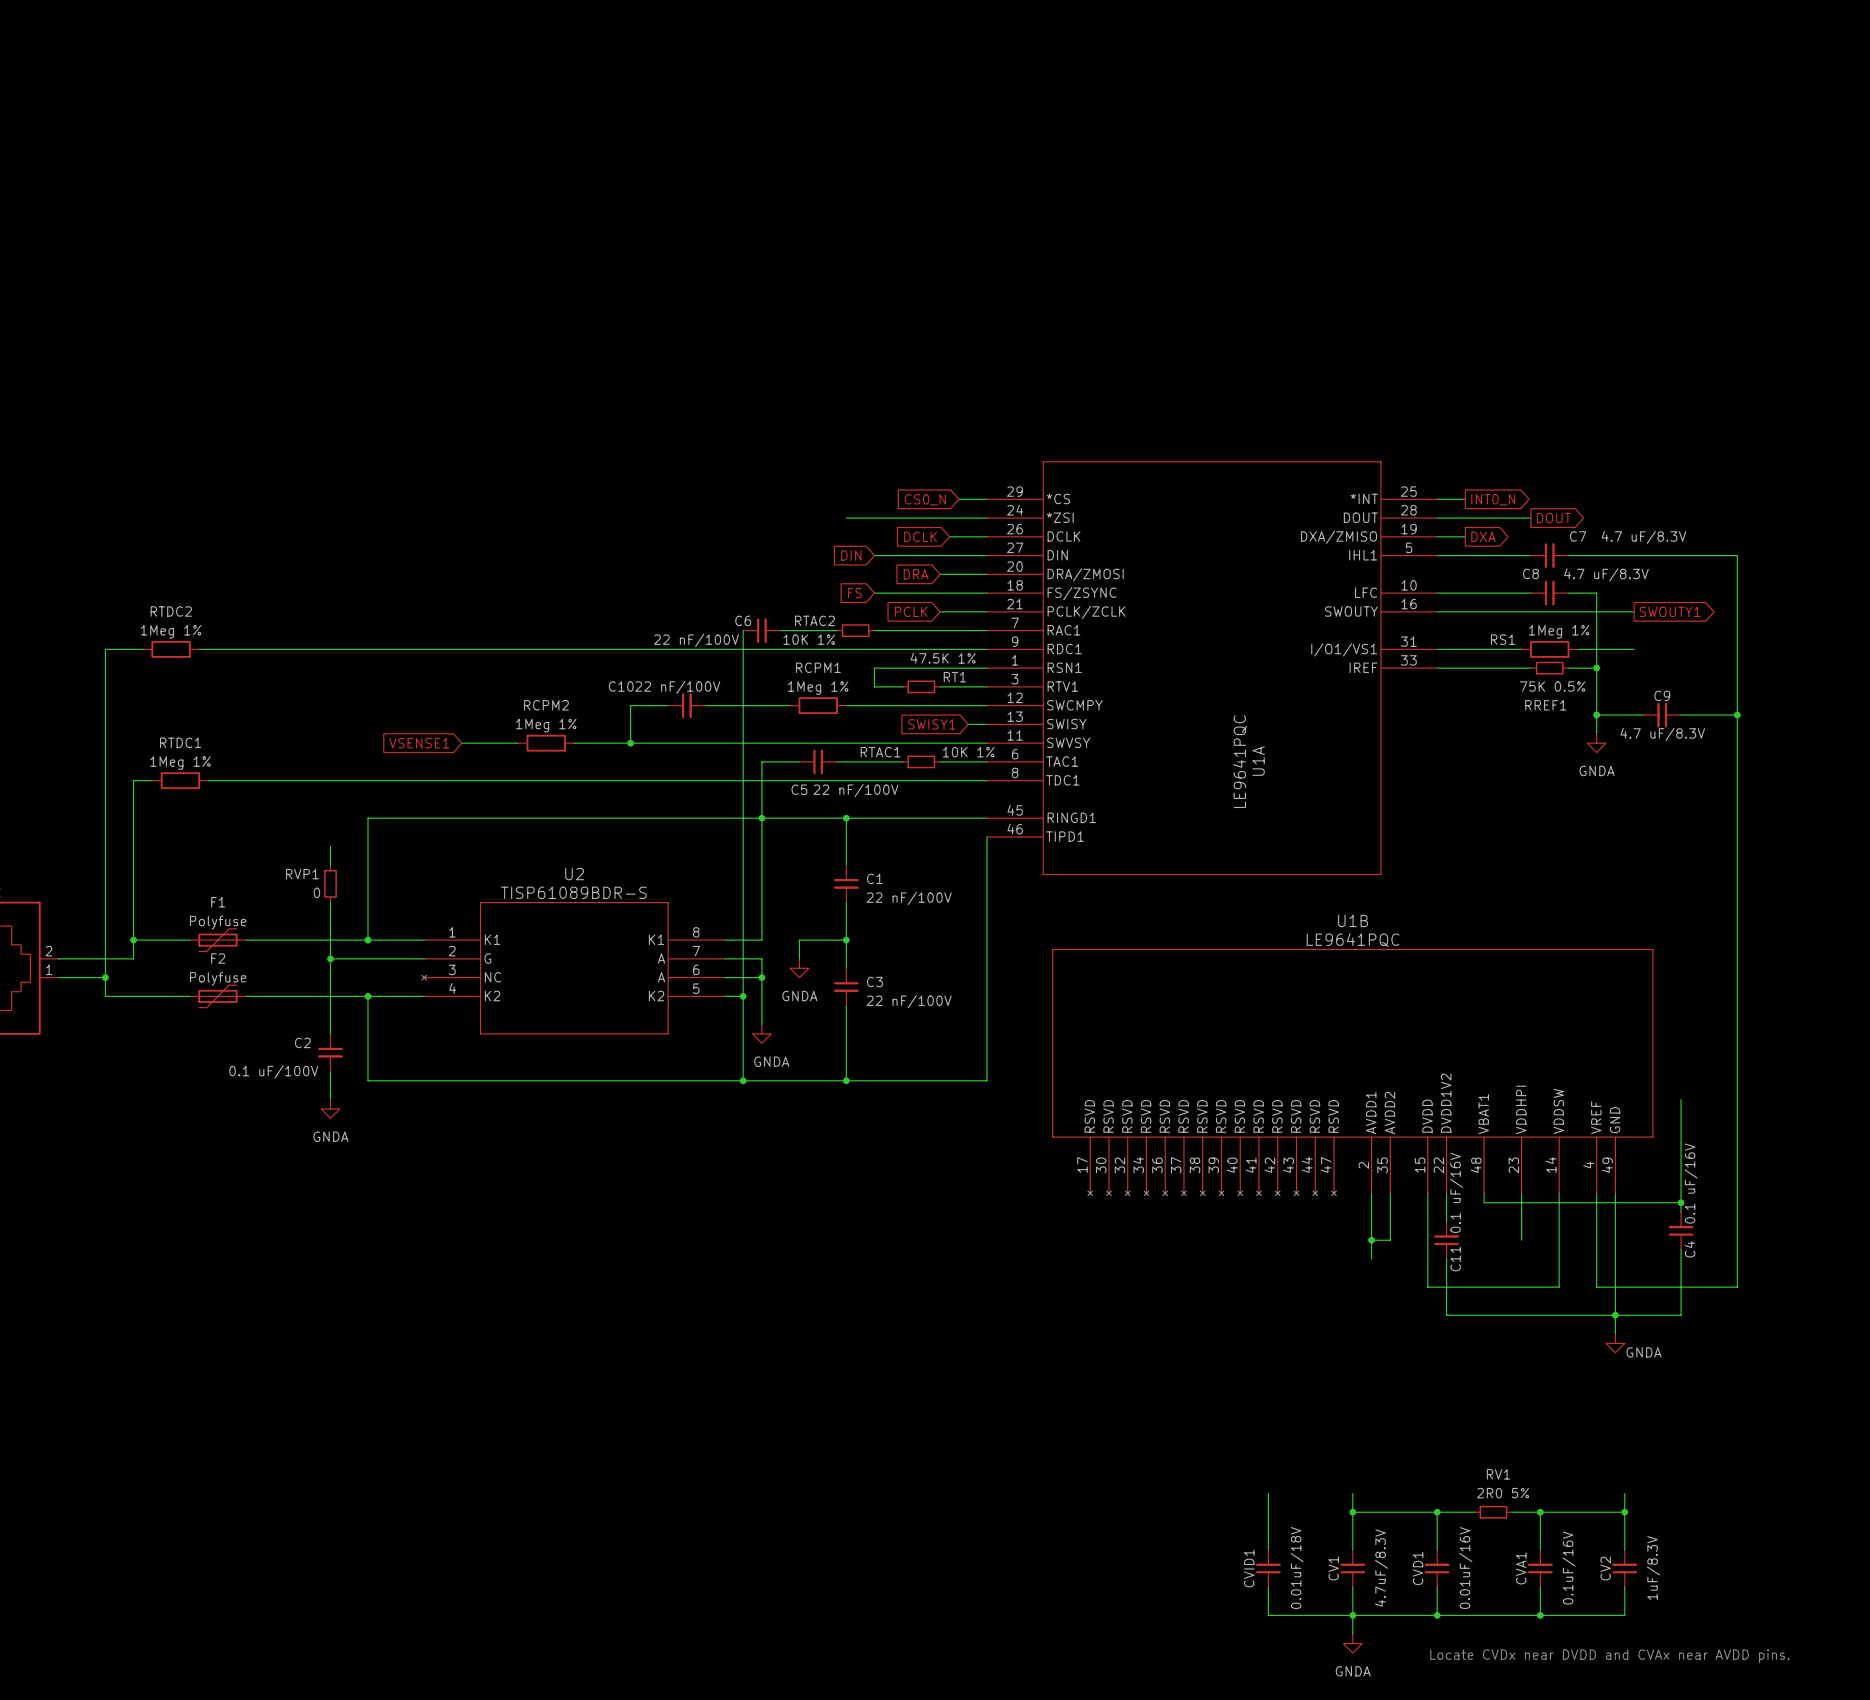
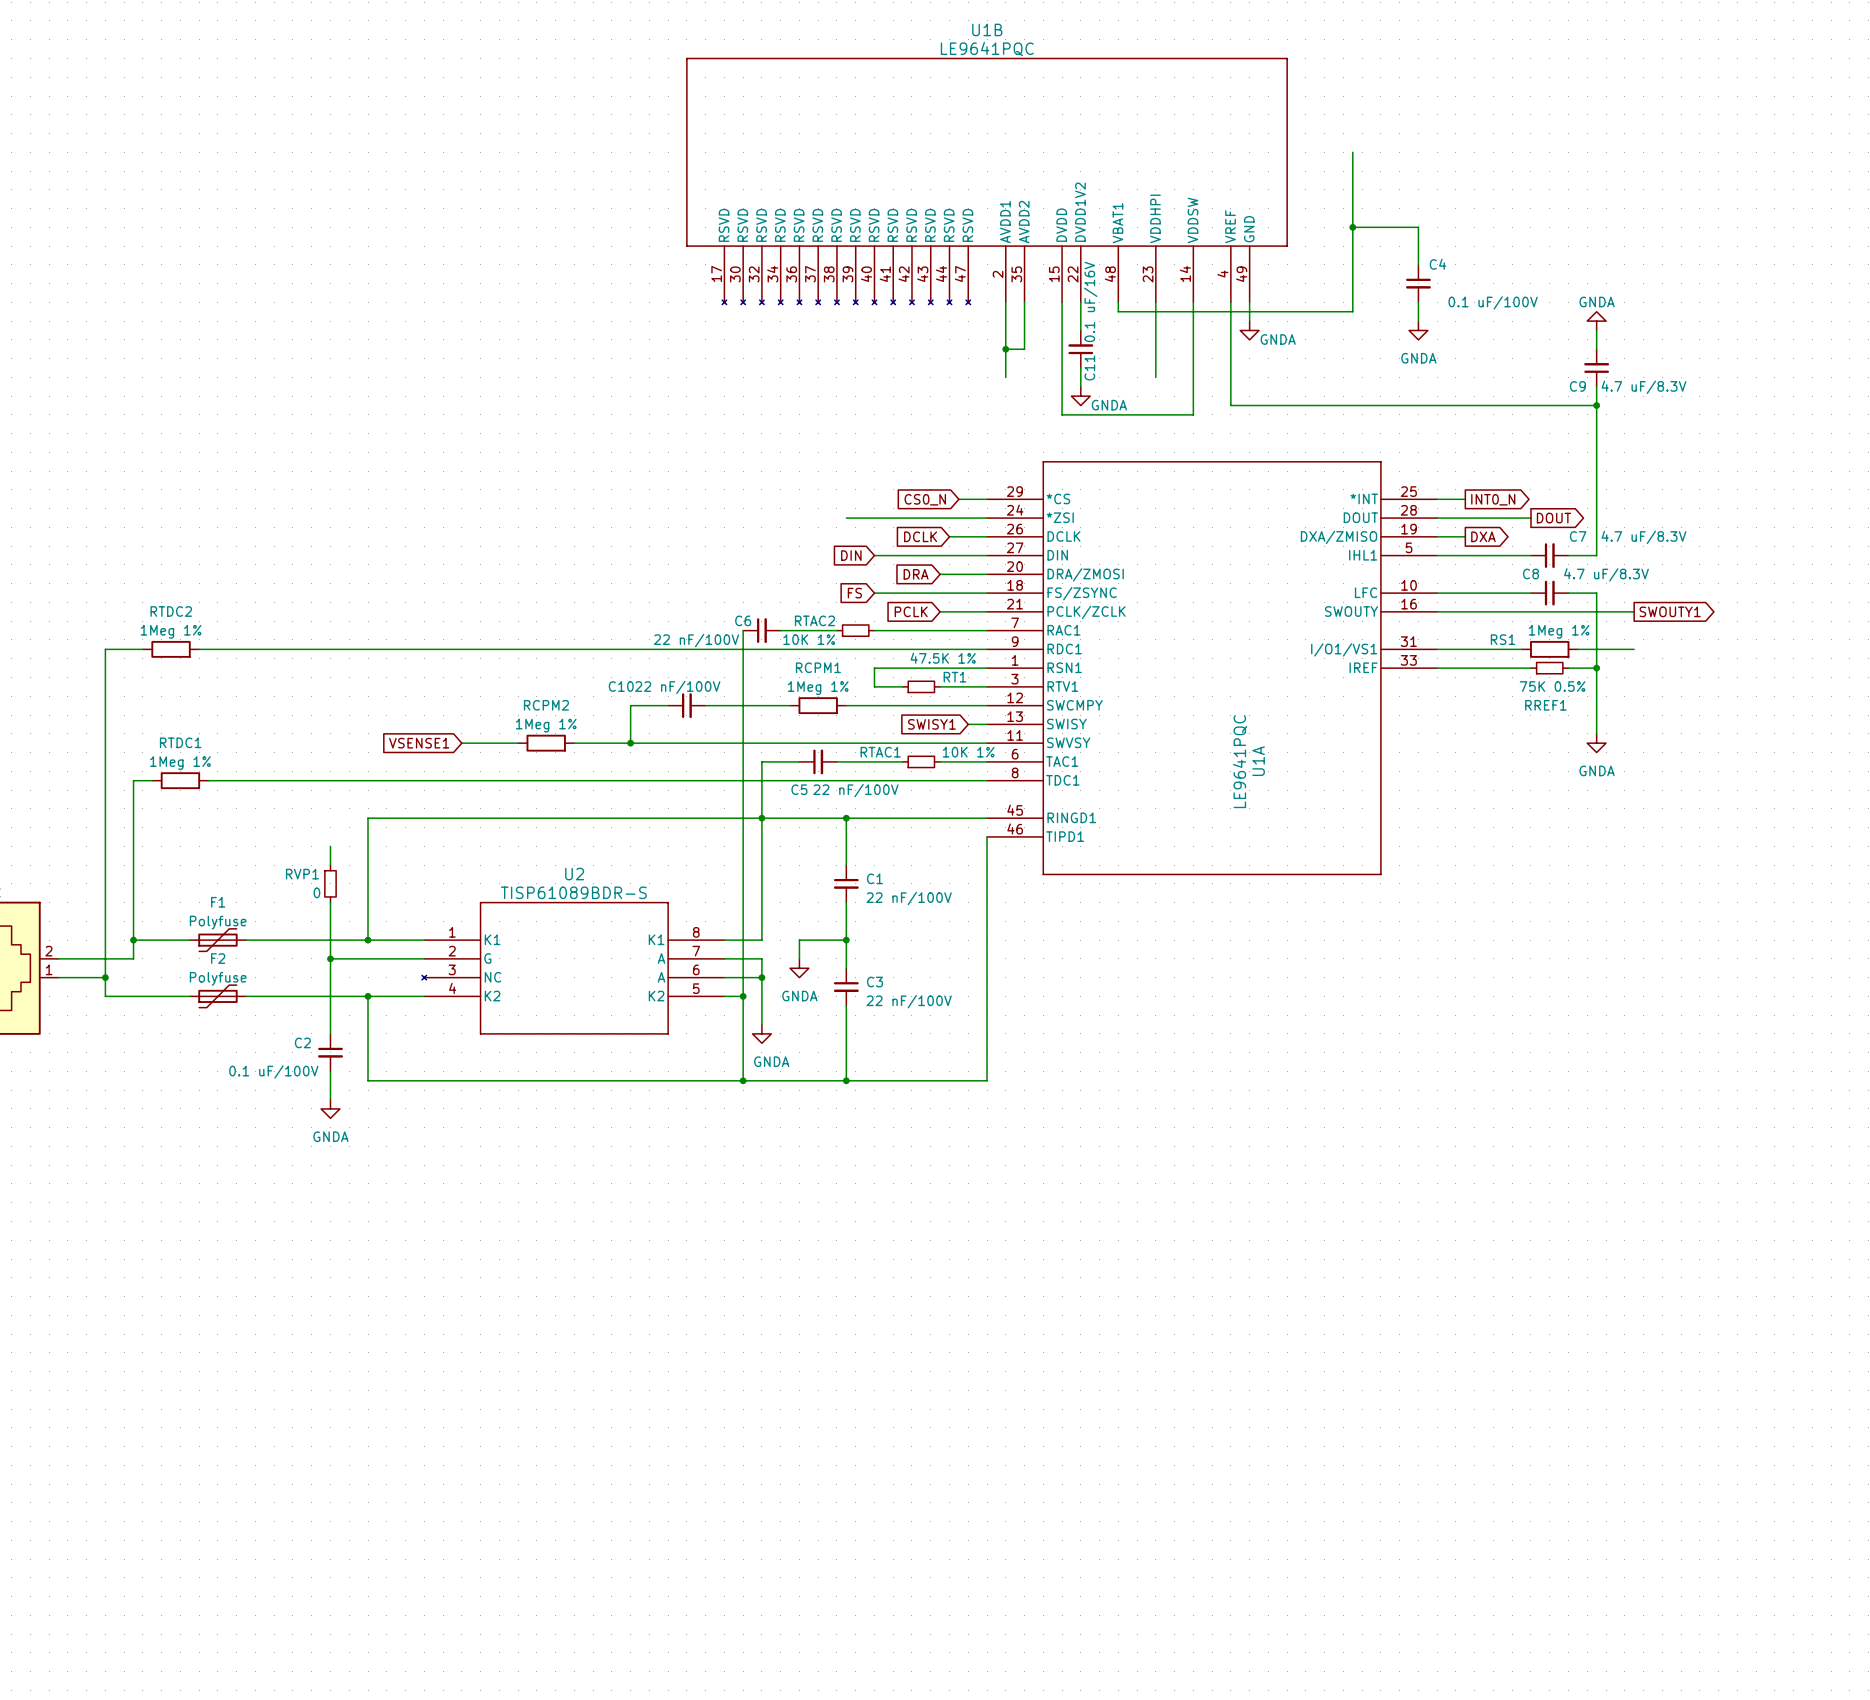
wire: none -> (1352, 152) (1352, 311) (1118, 311) (1118, 302)
wire: none -> (1352, 227) (1418, 227) (1418, 264)
junction: none -> (1352, 227)
wire: none -> (1005, 302) (1005, 377)
wire: none -> (1024, 302) (1024, 349) (1005, 349)
wire: none -> (1062, 302) (1062, 414) (1193, 414) (1193, 302)
wire: none -> (1080, 302) (1080, 330)
wire: none -> (1155, 302) (1155, 377)
wire: none -> (1230, 302) (1230, 405) (1596, 405)
wire: none -> (1249, 302) (1249, 321)
wire: none -> (1418, 302) (1418, 321)
power symbol: none -> GNDA (1596, 321)
power symbol: none -> GNDA (1249, 330)
power symbol: none -> GNDA (1418, 330)
wire: none -> (1596, 330) (1596, 349)
junction: none -> (1005, 349)
wire: none -> (1080, 368) (1080, 386)
power symbol: none -> GNDA (1080, 396)
junction: none -> (1596, 405)
wire: (1596, 555) (1737, 555) (1737, 1287) (1596, 1287) (1596, 1193) -> (1596, 555) (1596, 386)
C9 name position: C9 (1662, 695) -> C9 (1577, 386)
wire: (1596, 715) (1643, 715) -> none
junction: (1596, 715) -> none
C9 rotation: 0° (1662, 715) -> 90° clockwise (1596, 367)
C9 position: (1662, 715) -> (1596, 368)
wire: (1681, 715) (1737, 715) -> none
junction: (1737, 715) -> none
C9 value position: 4.7 uF/8.3V (1662, 734) -> 4.7 uF/8.3V (1643, 387)
U1B position: (1352, 1072) -> (987, 181)
wire: (1681, 1099) (1681, 1212) -> none
C4 value: 0.1 uF/16V (1690, 1183) -> 0.1 uF/100V (1493, 302)
wire: (1371, 1193) (1371, 1259) -> none
wire: (1390, 1193) (1390, 1240) (1371, 1240) -> none
wire: (1427, 1193) (1427, 1287) (1559, 1287) (1559, 1193) -> none
wire: (1446, 1193) (1446, 1221) -> none
wire: (1484, 1193) (1484, 1202) (1681, 1202) -> none
wire: (1521, 1193) (1521, 1240) -> none
wire: (1615, 1193) (1615, 1334) -> none
junction: (1681, 1202) -> none
C4 rotation: 0° (1681, 1230) -> 180° (1418, 283)
C4 position: (1681, 1230) -> (1418, 283)
junction: (1371, 1240) -> none
C11 position: (1446, 1240) -> (1080, 349)
wire: (1681, 1249) (1681, 1315) (1446, 1315) (1446, 1259) -> none
C4 name position: C4 (1689, 1249) -> C4 (1437, 264)
junction: (1615, 1315) -> none
power symbol: GNDA (1615, 1343) -> none
wire: (1268, 1493) (1268, 1549) -> none
wire: (1352, 1493) (1352, 1549) -> none
wire: (1624, 1493) (1624, 1549) -> none
wire: (1352, 1512) (1474, 1512) -> none
junction: (1352, 1512) -> none
wire: (1437, 1512) (1437, 1549) -> none
junction: (1437, 1512) -> none
RV1: 2R0 5% (1493, 1512) -> none
wire: (1512, 1512) (1624, 1512) -> none
wire: (1540, 1512) (1540, 1549) -> none
junction: (1540, 1512) -> none
junction: (1624, 1512) -> none
CVID1: 0.01uF/18V (1268, 1568) -> none
CV1: 4.7uF/8.3V (1352, 1568) -> none
CVD1: 0.01uF/16V (1437, 1568) -> none
CVA1: 0.1uF/16V (1540, 1568) -> none
CV2: 1uF/8.3V (1624, 1568) -> none
wire: (1268, 1587) (1268, 1615) (1624, 1615) (1624, 1587) -> none
wire: (1352, 1587) (1352, 1634) -> none
wire: (1437, 1587) (1437, 1615) -> none
wire: (1540, 1587) (1540, 1615) -> none
junction: (1352, 1615) -> none
junction: (1437, 1615) -> none
junction: (1540, 1615) -> none
power symbol: GNDA (1352, 1643) -> none
text: Locate CVDx near DVDD and CVAx near AVDD pins. (1609, 1656) -> none

